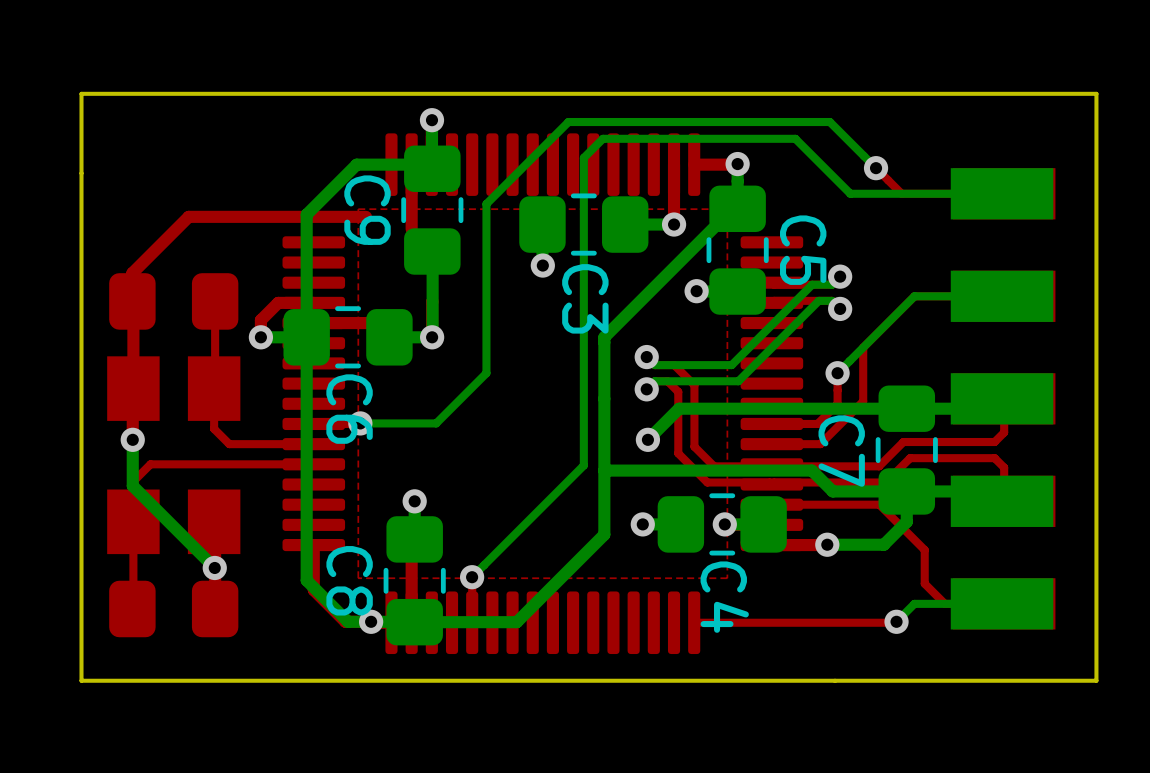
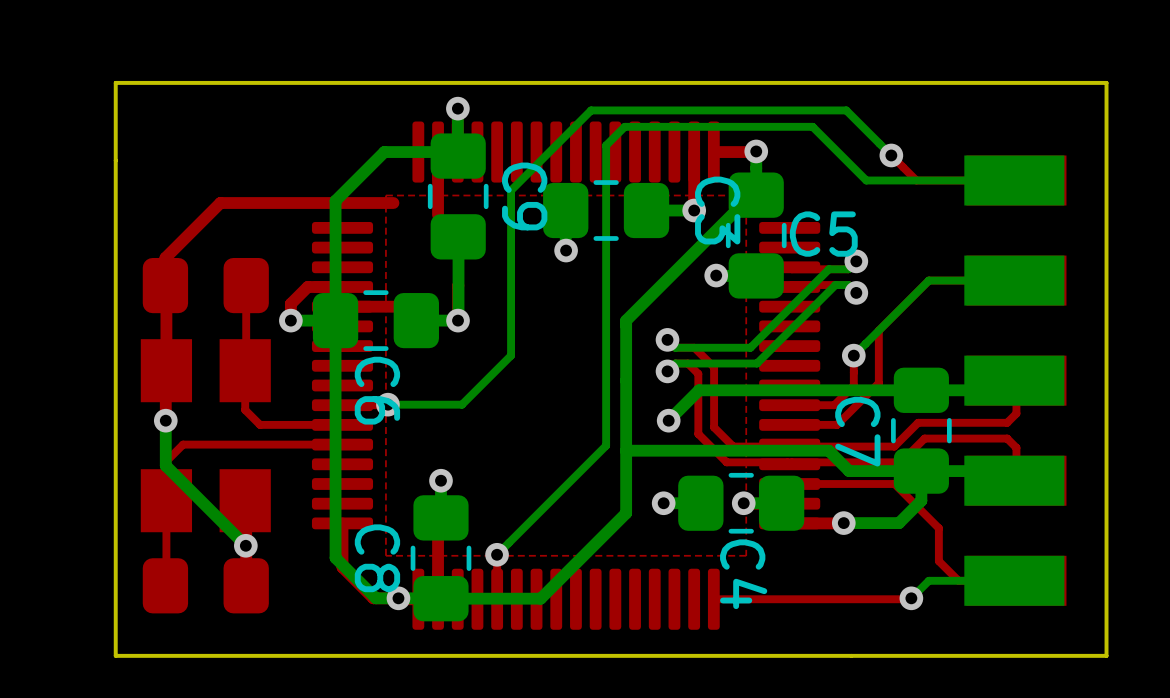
C9 name position: C9 (367, 210) -> C9 (524, 196)
C5 name rotation: 0° (803, 250) -> 90° counterclockwise (823, 234)
C3 name position: C3 (585, 298) -> C3 (717, 210)

